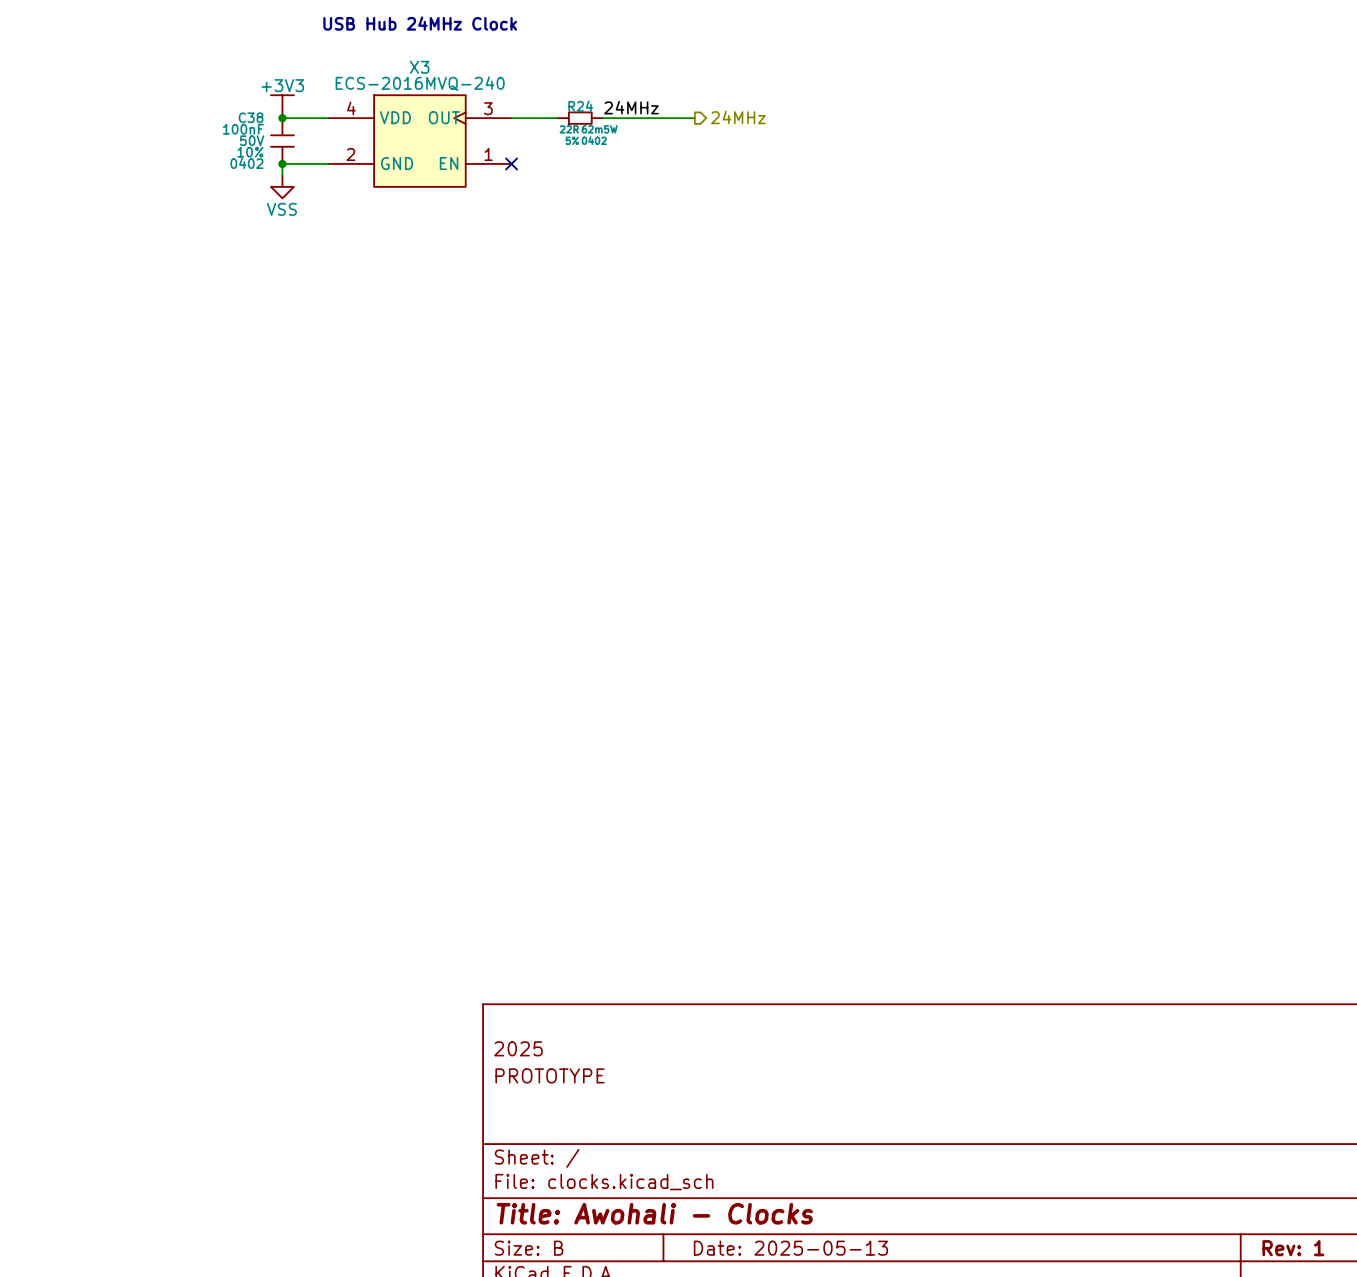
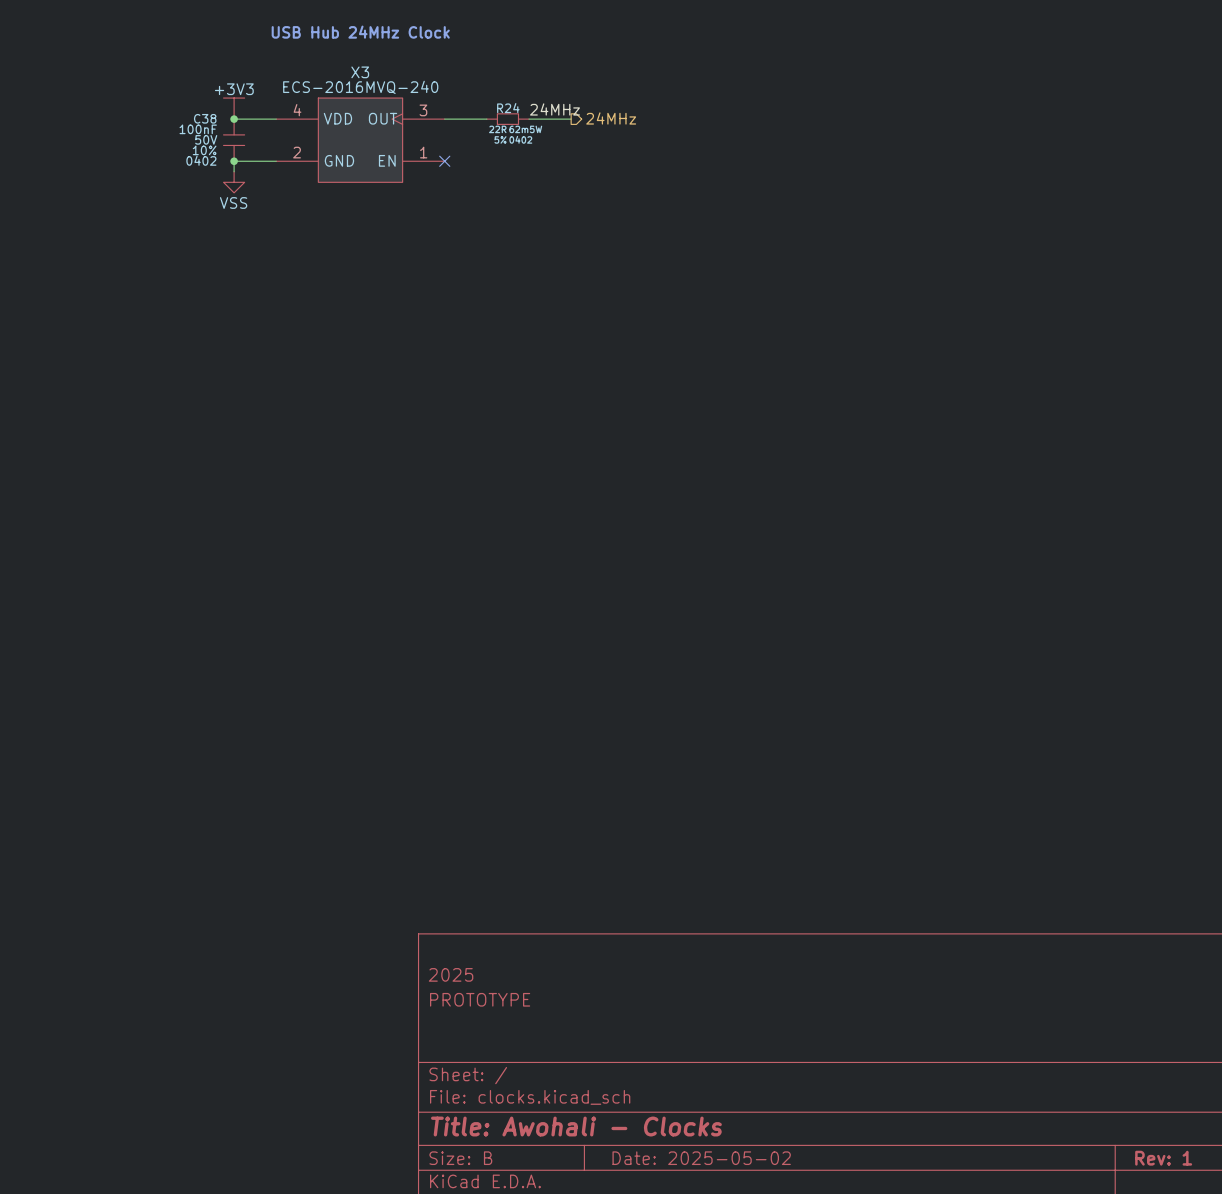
hierarchical label position: 24MHz (738, 117) -> 24MHz (611, 118)
wire: (649, 118) (694, 118) -> none
title block: Date: 2025-05-13 (790, 1248) -> Date: 2025-05-02 (701, 1158)

